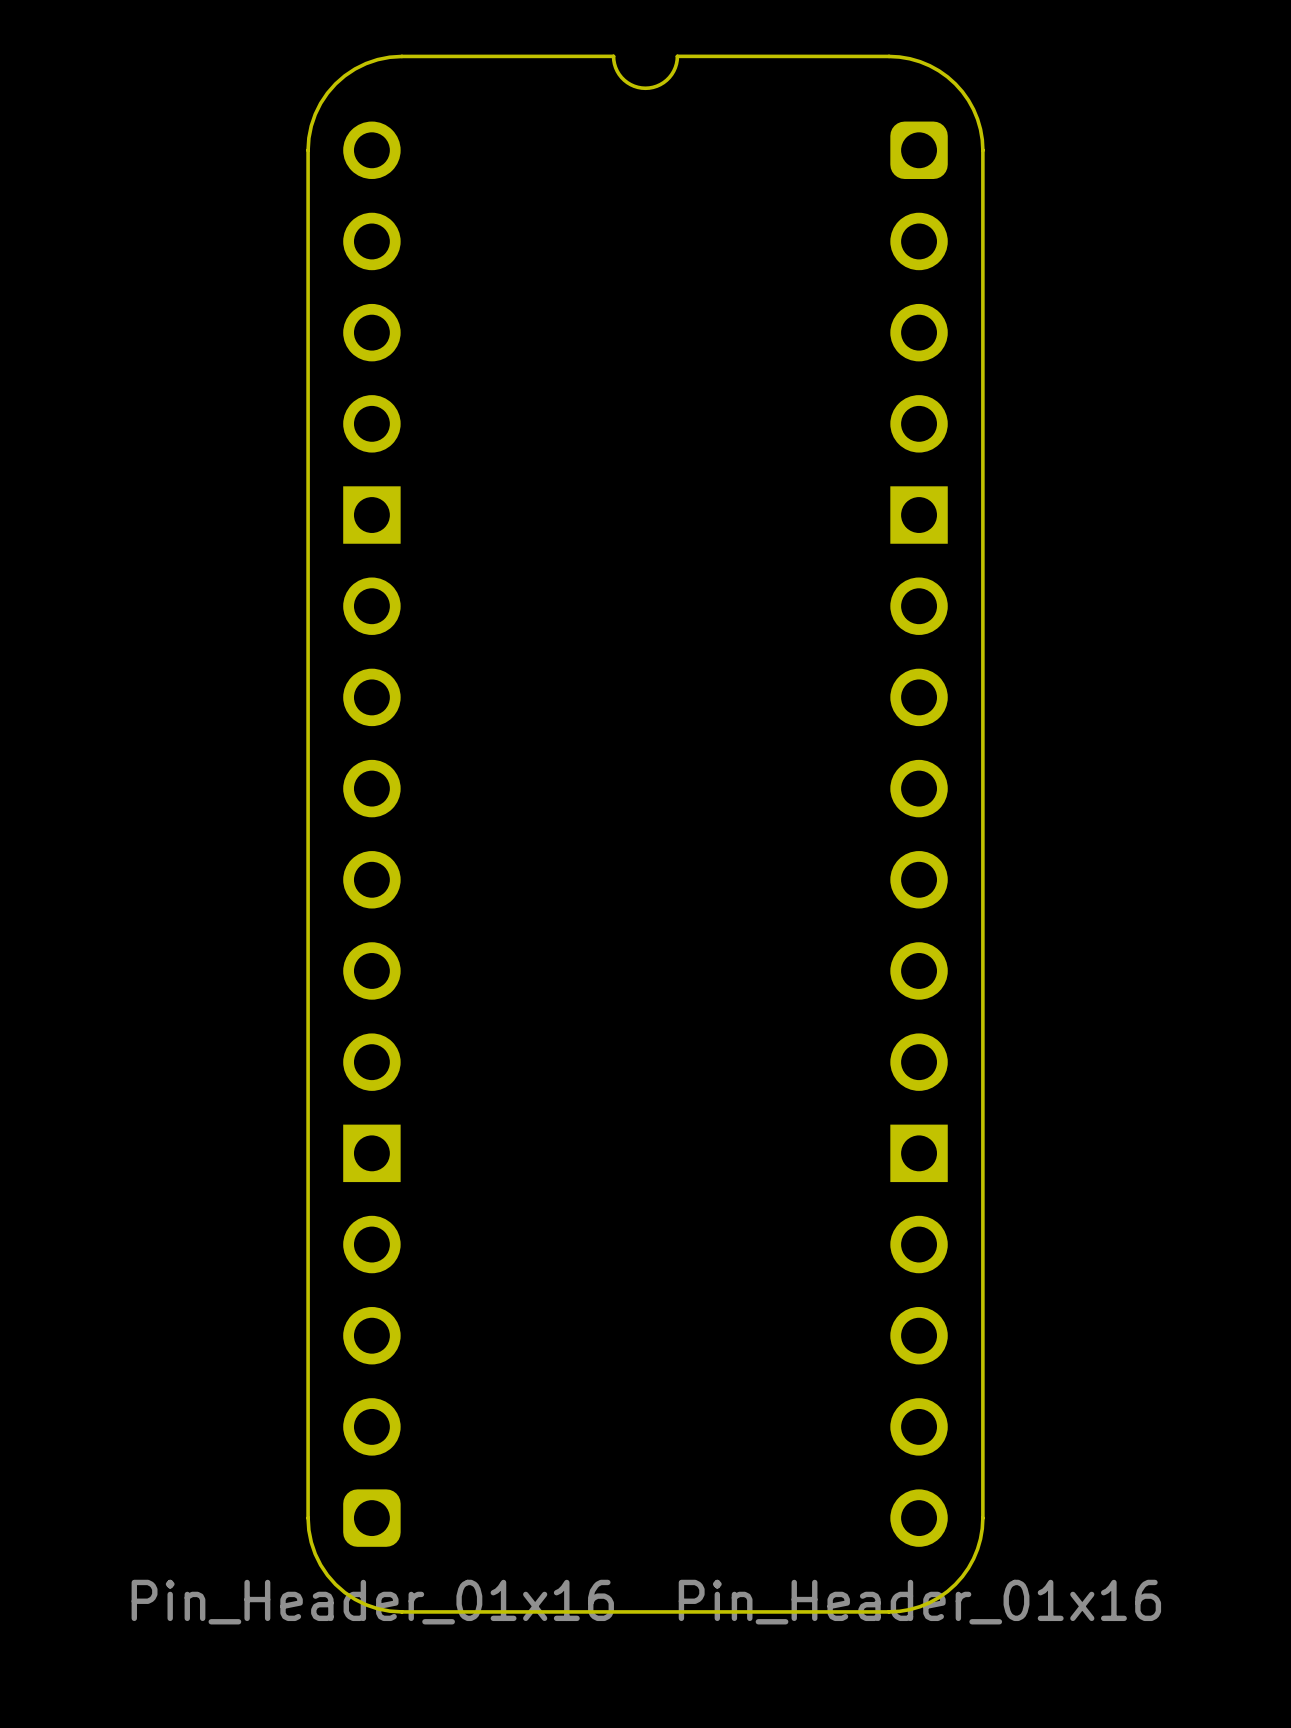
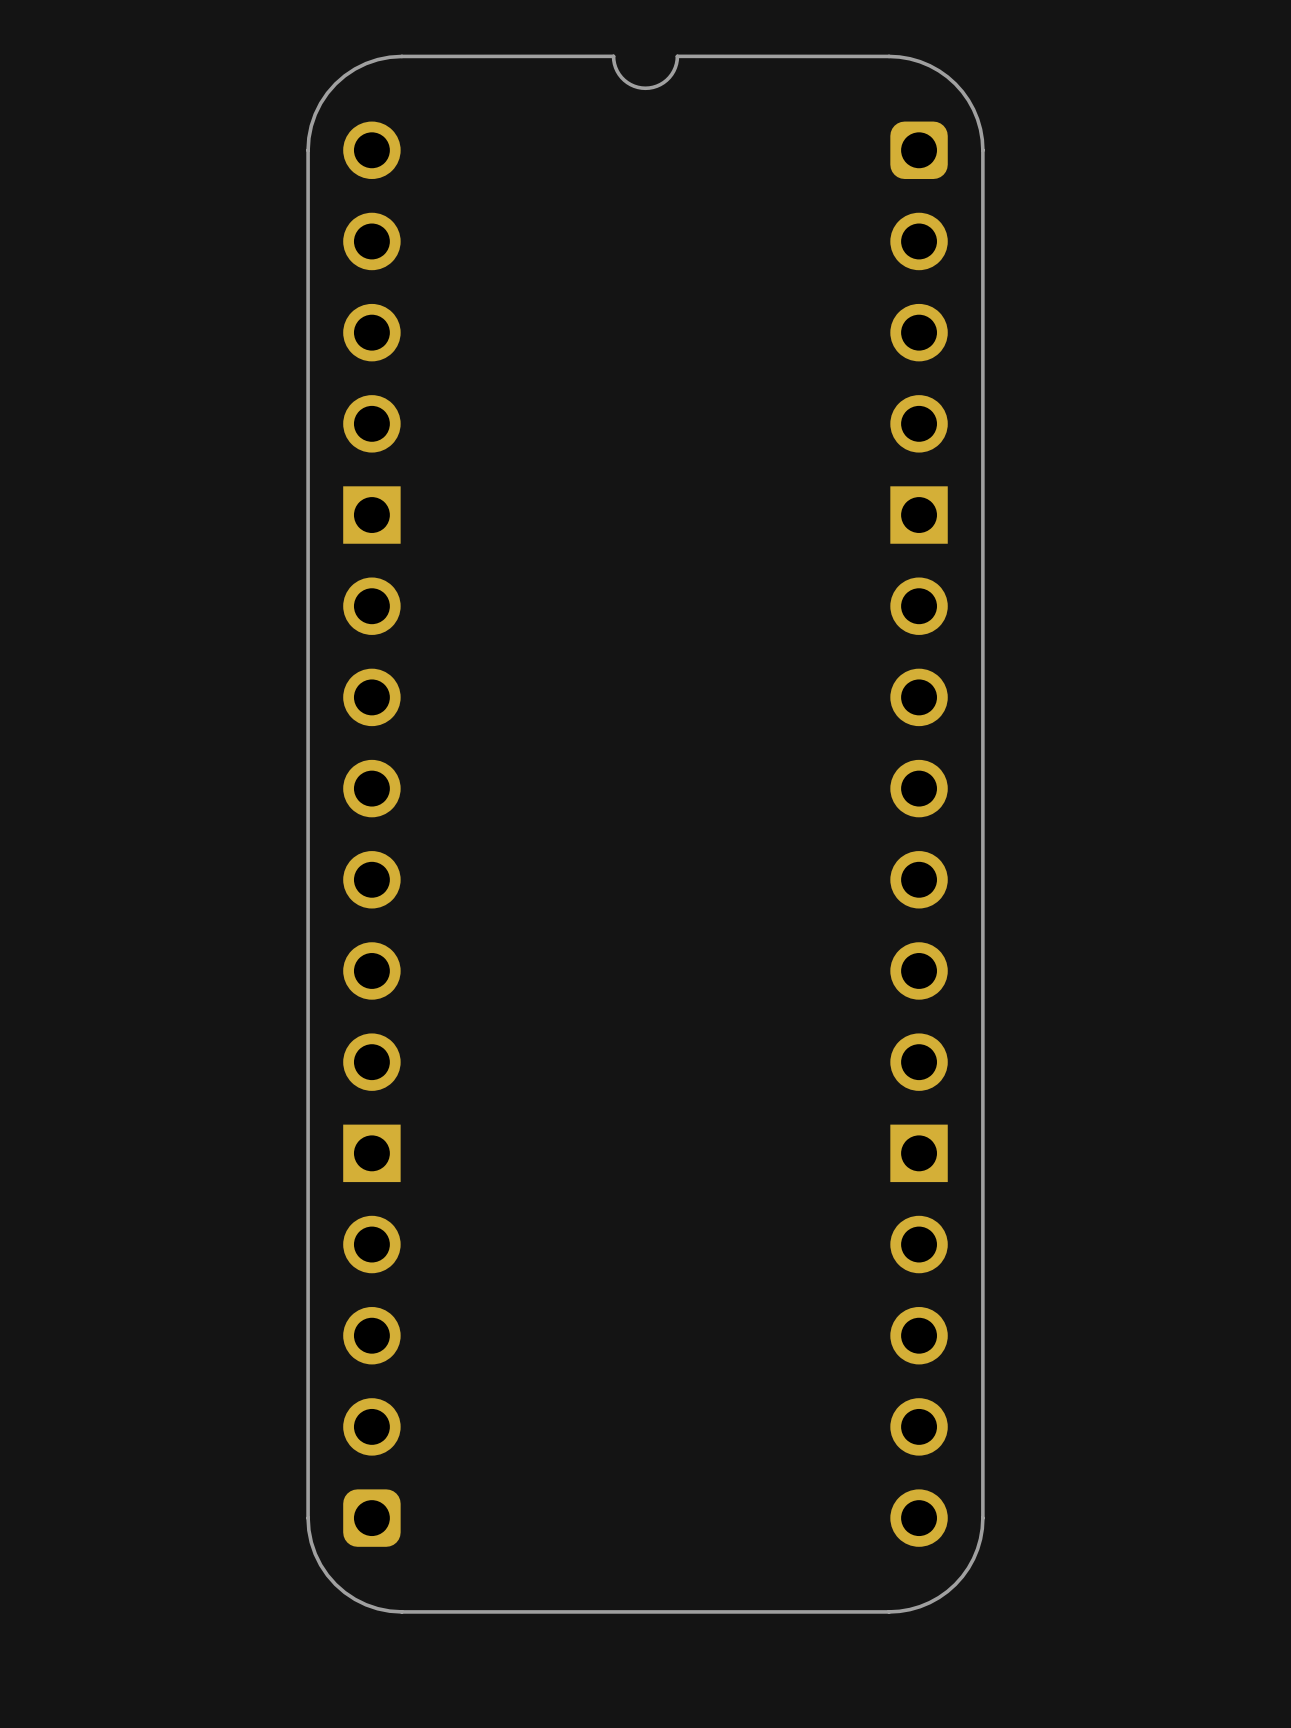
drawing: [131, 1579, 1162, 1625] -> none

